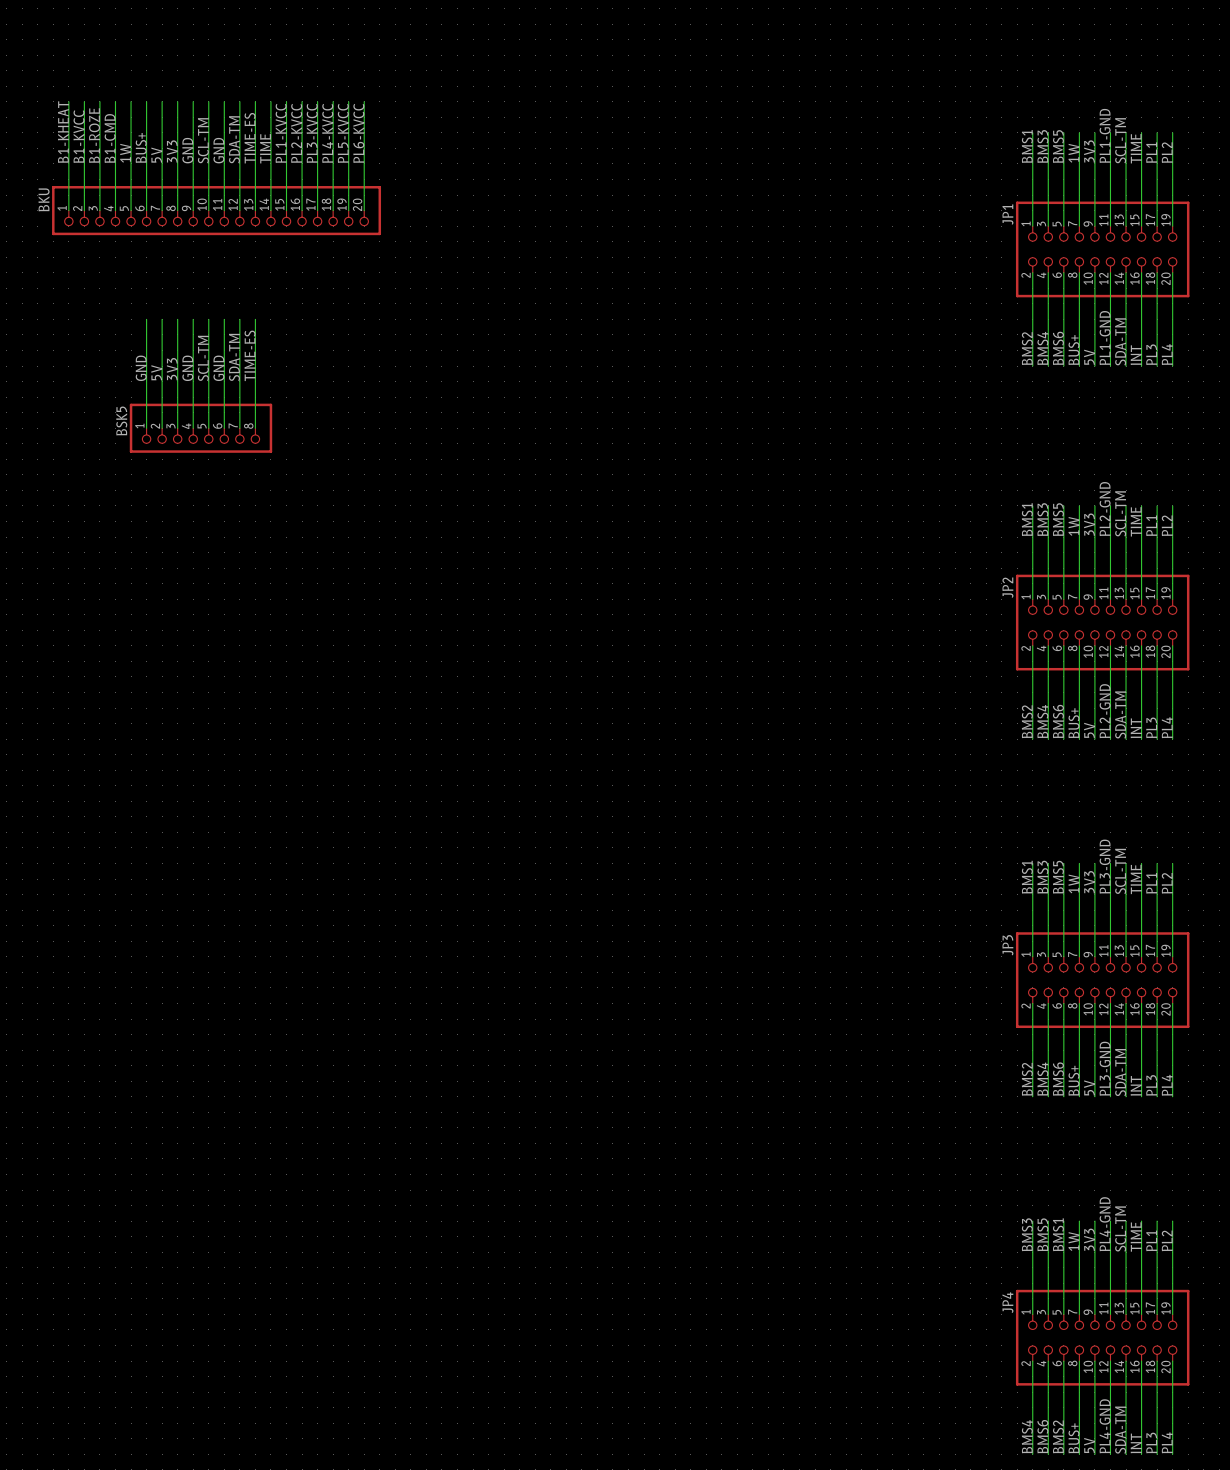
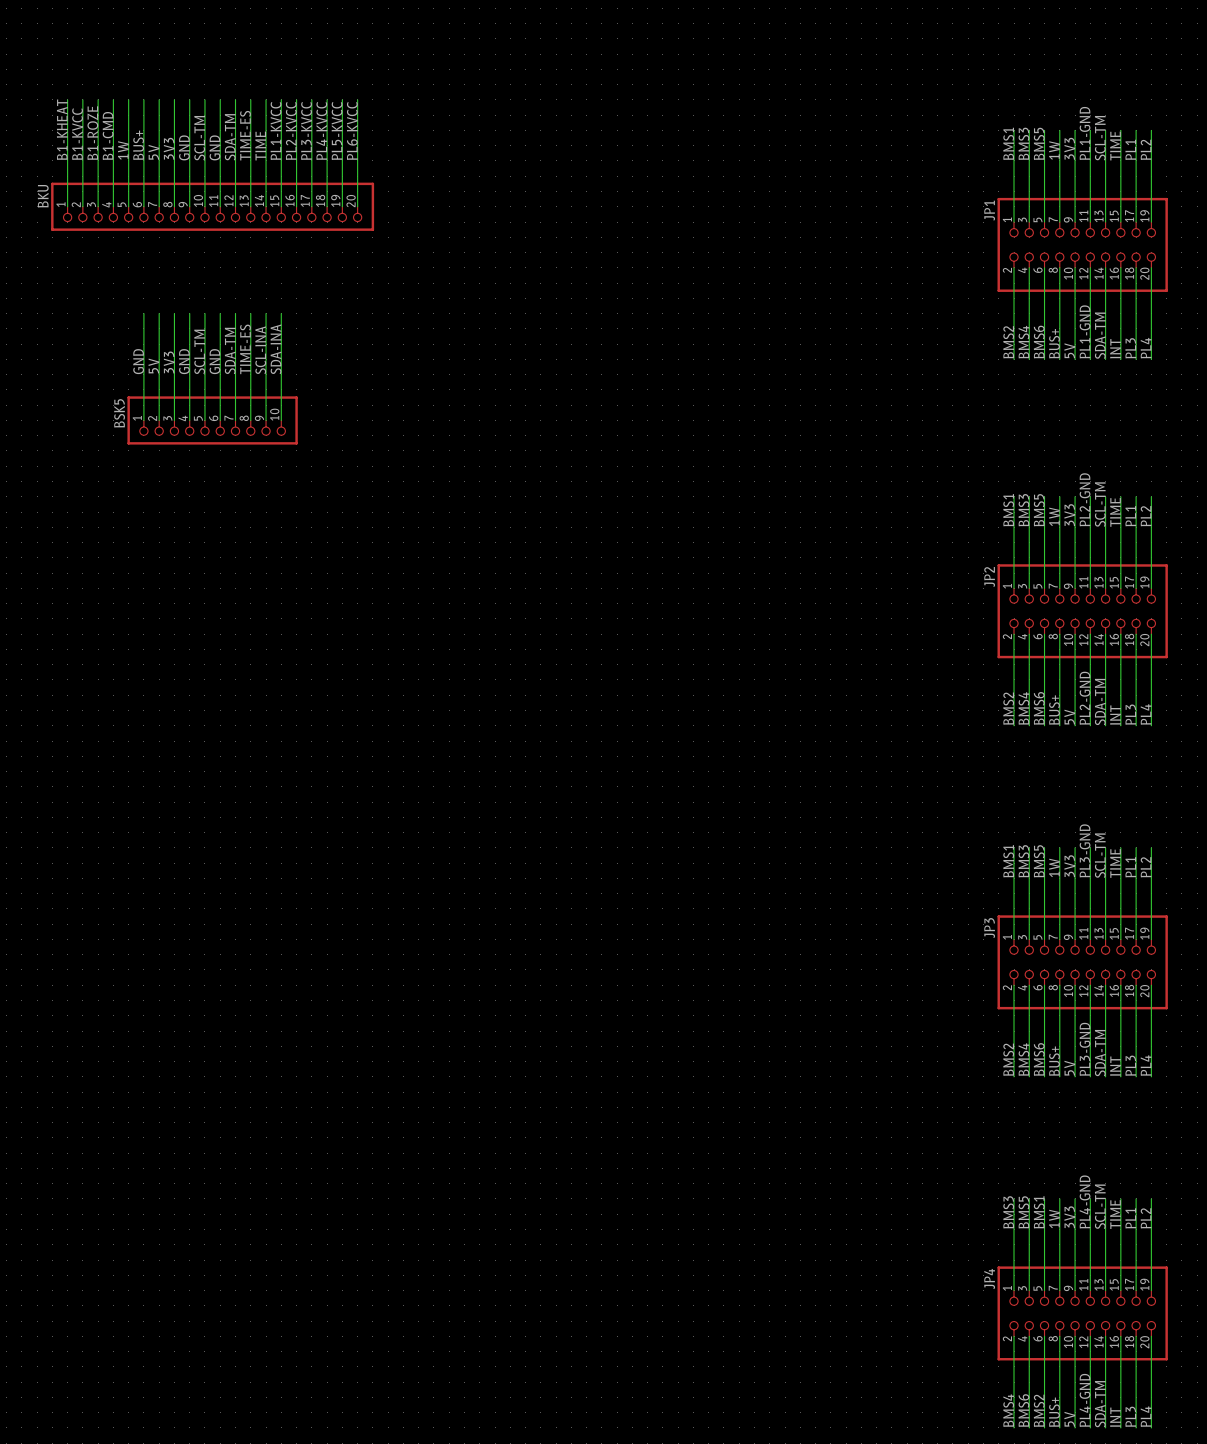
wire: none -> (266, 313) (266, 420)
wire: none -> (281, 313) (281, 420)
label: none -> SDA-INA (276, 349)
label: none -> SCL-INA (260, 350)
BSK5 symbol: [129, 403, 273, 453] -> [127, 396, 298, 445]

